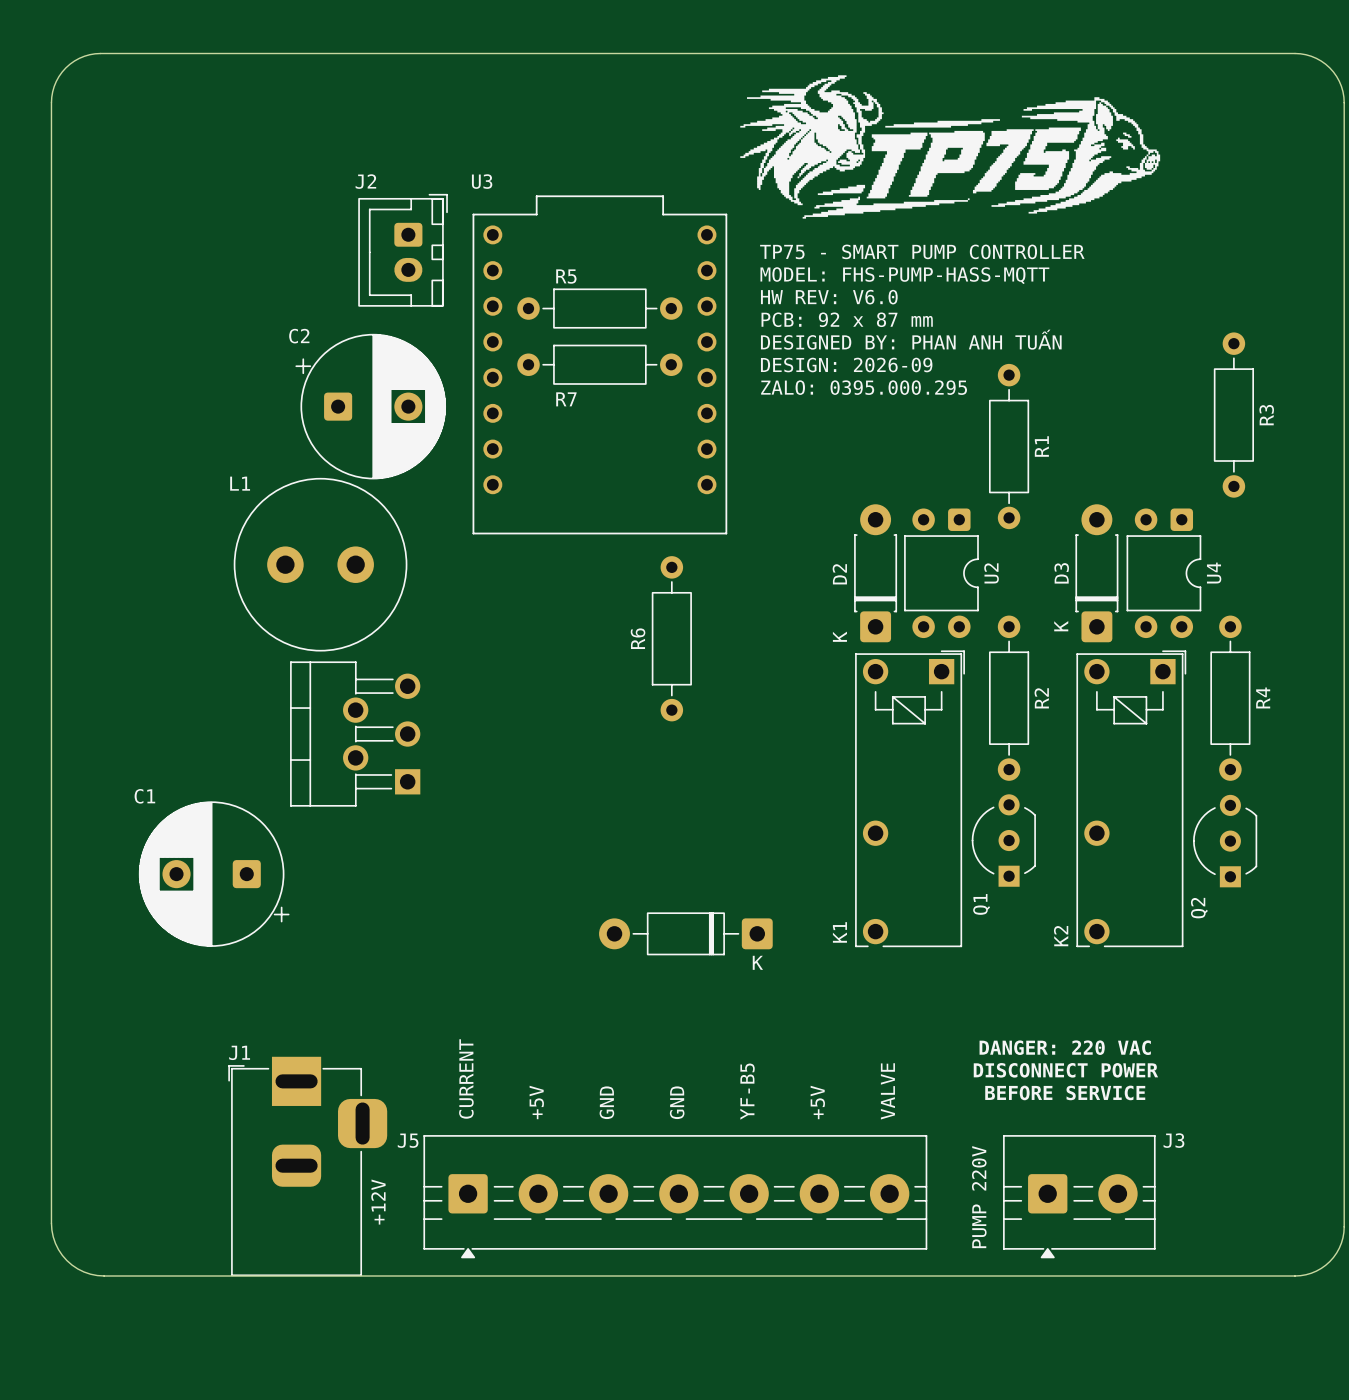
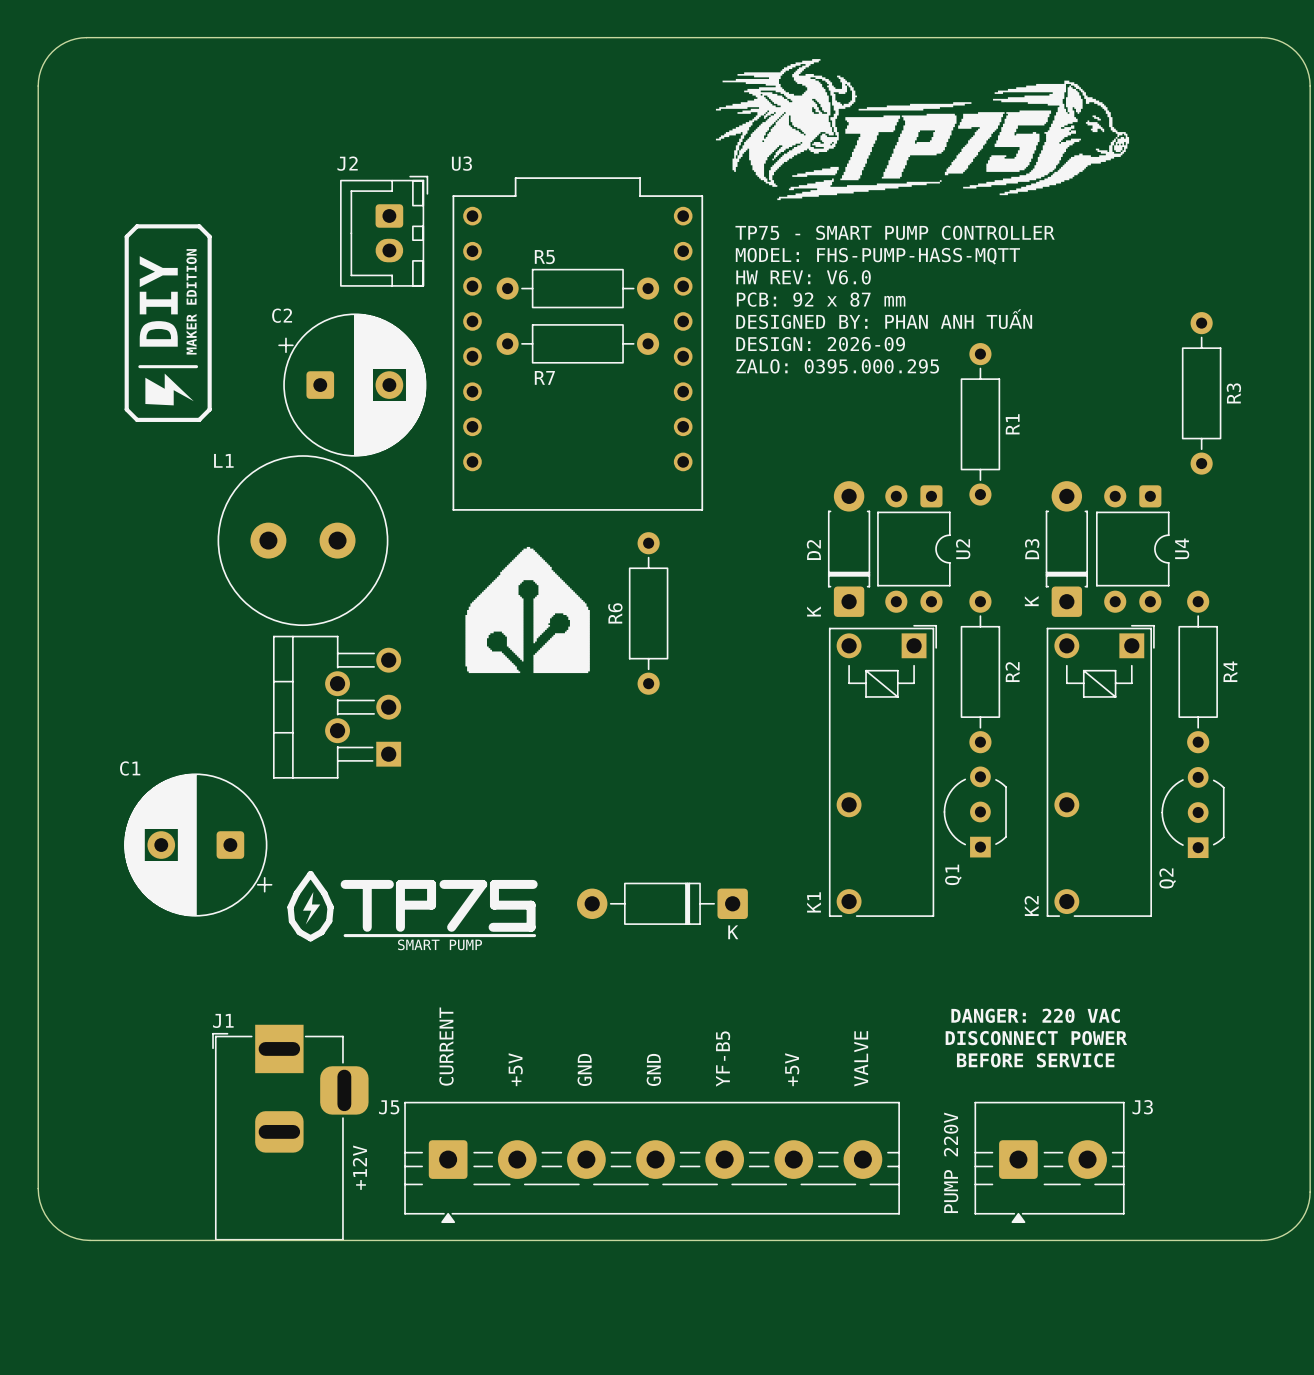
drawing: none -> [124, 224, 212, 422]
drawing: none -> [465, 546, 590, 674]
drawing: none -> [287, 870, 538, 942]

